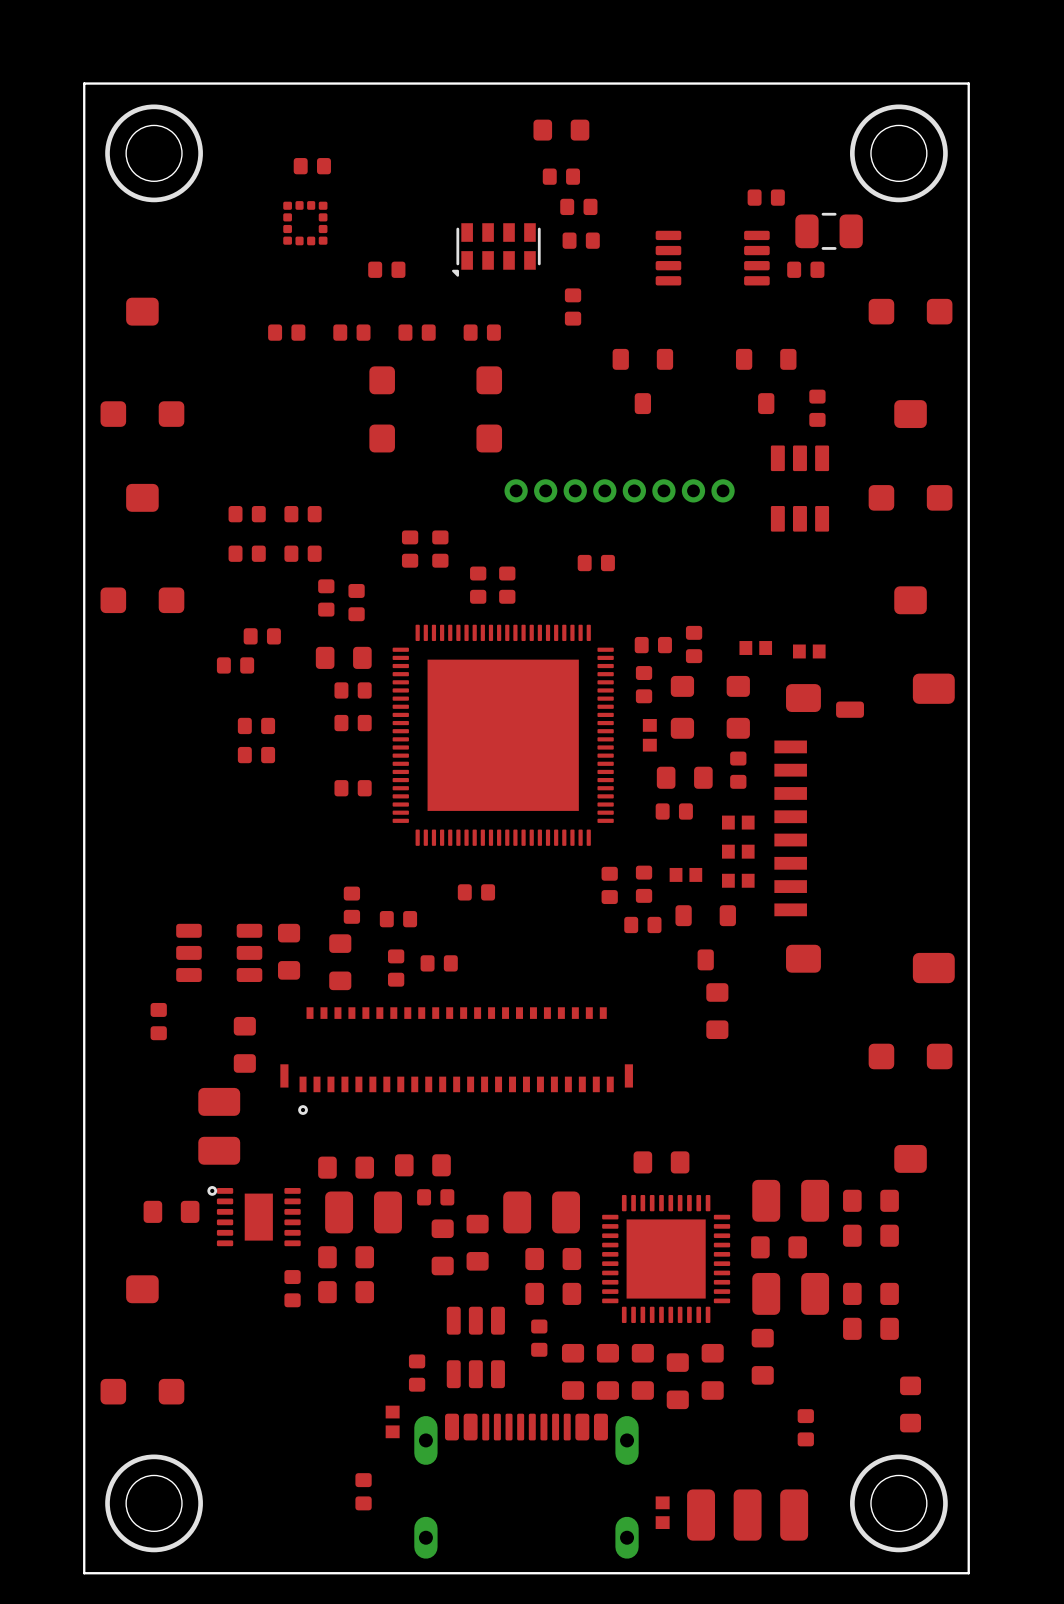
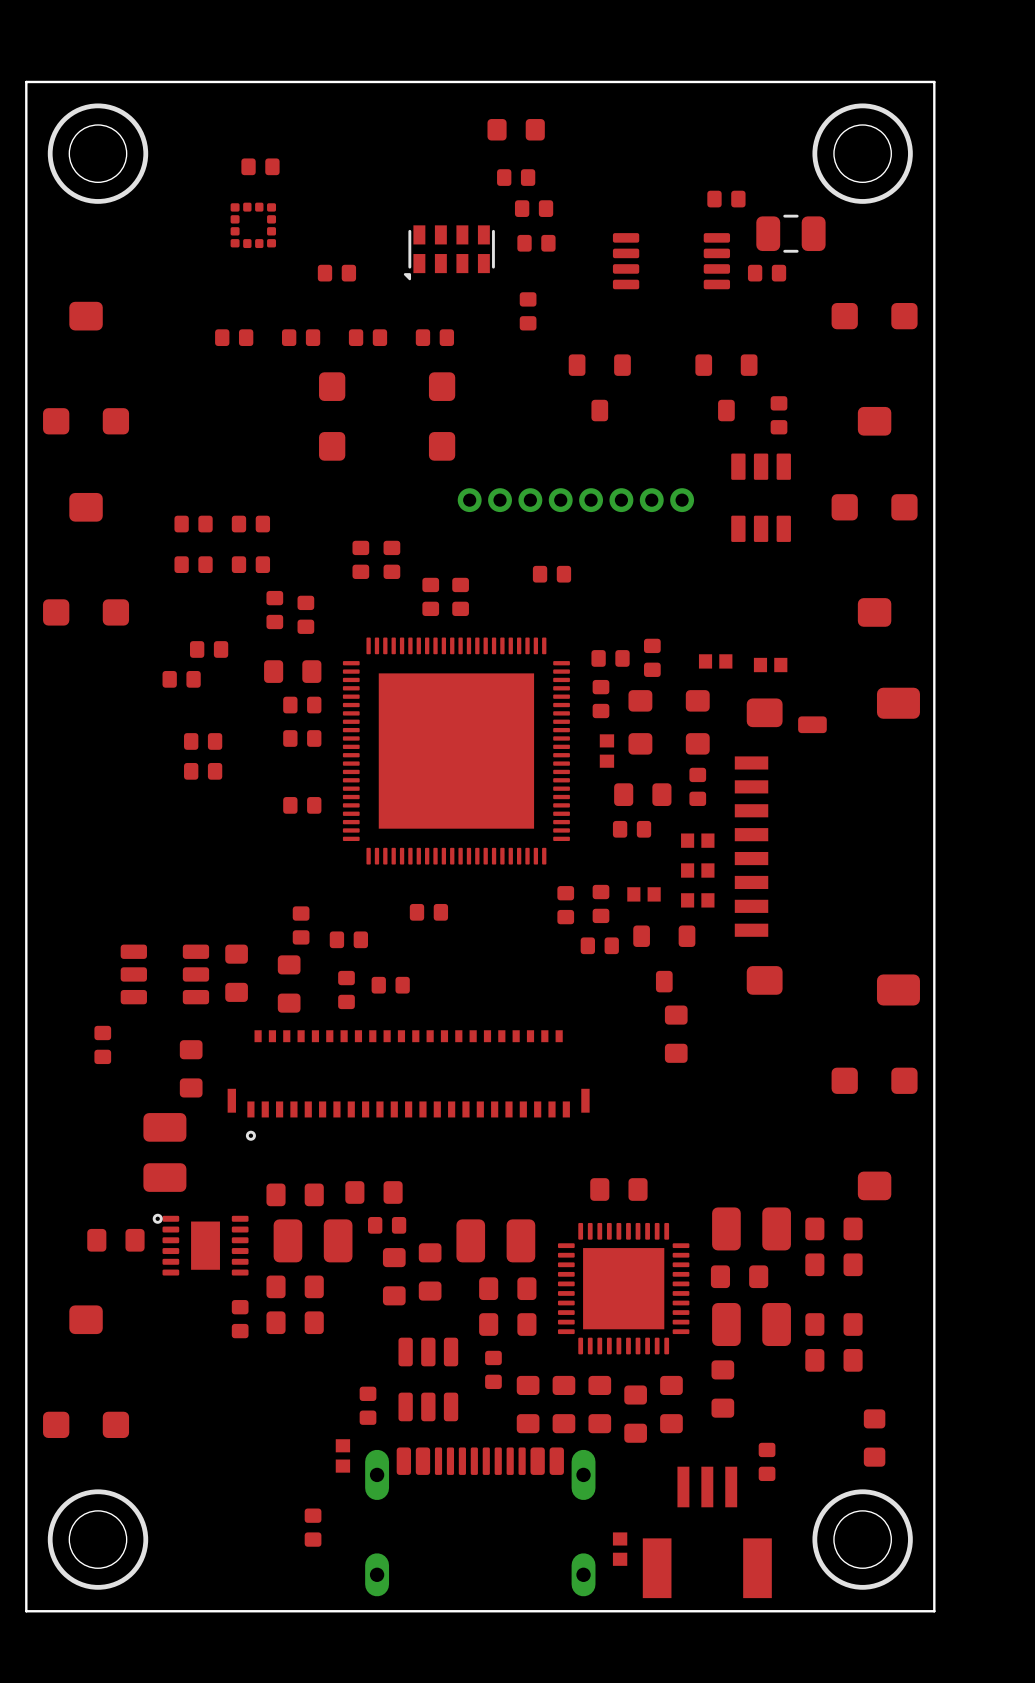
part footprint: [687, 1489, 809, 1541] -> [642, 1466, 772, 1599]

